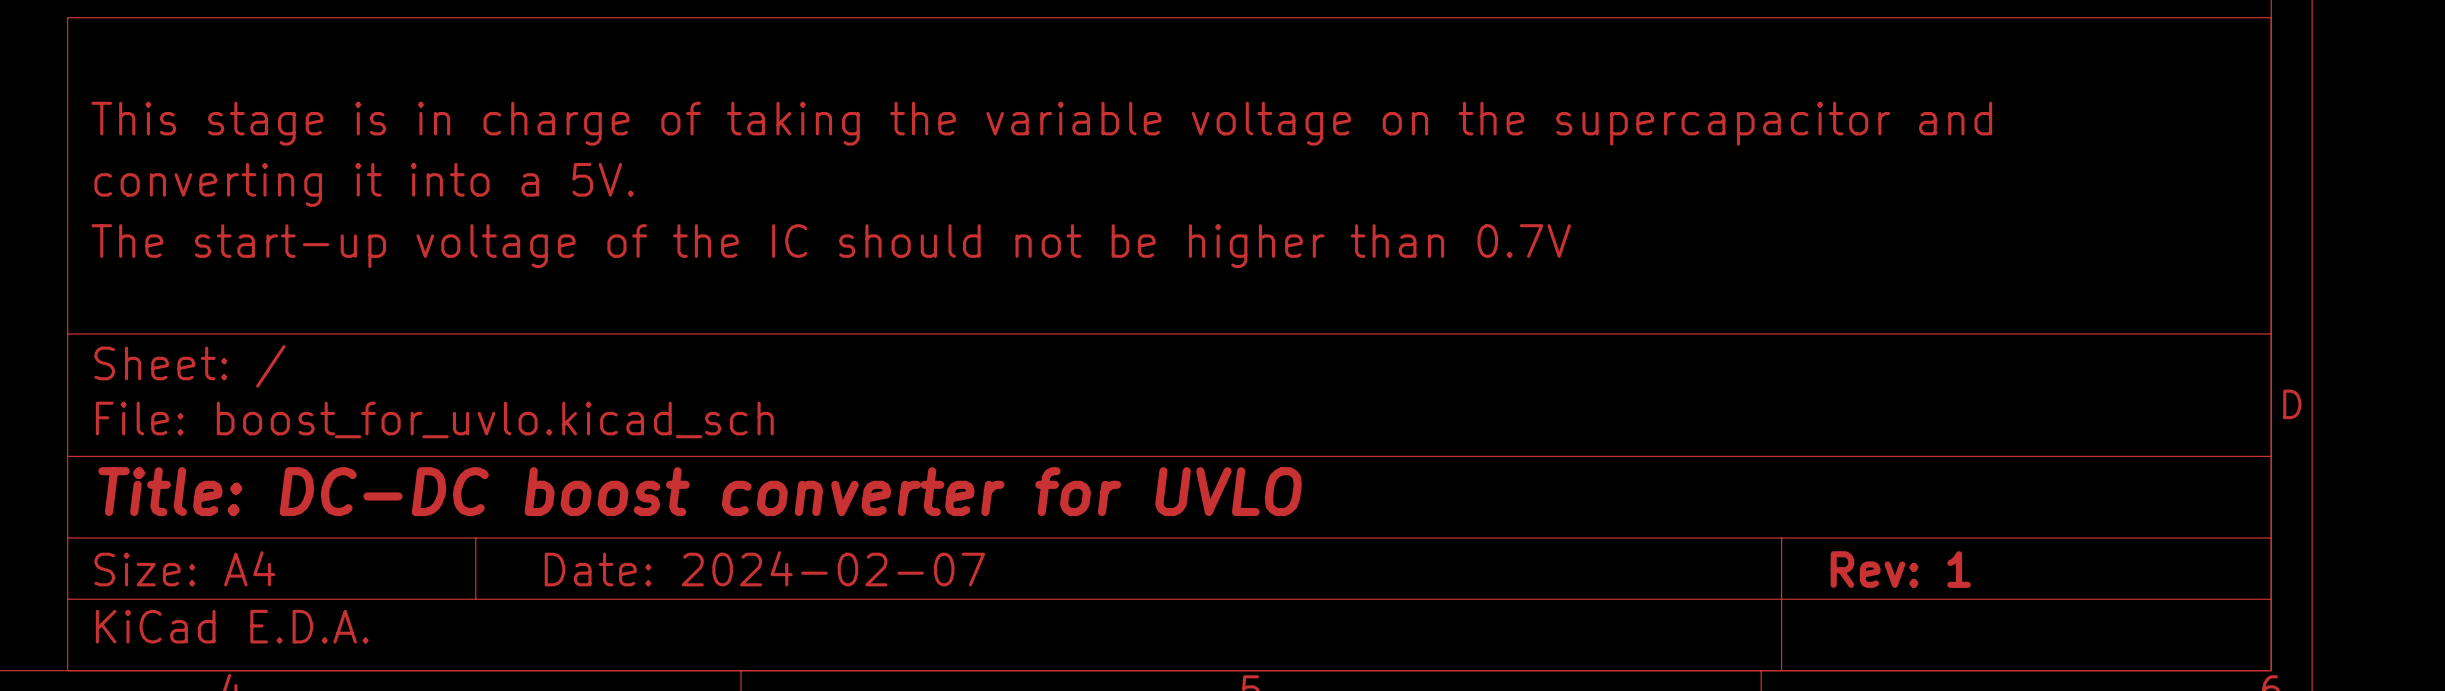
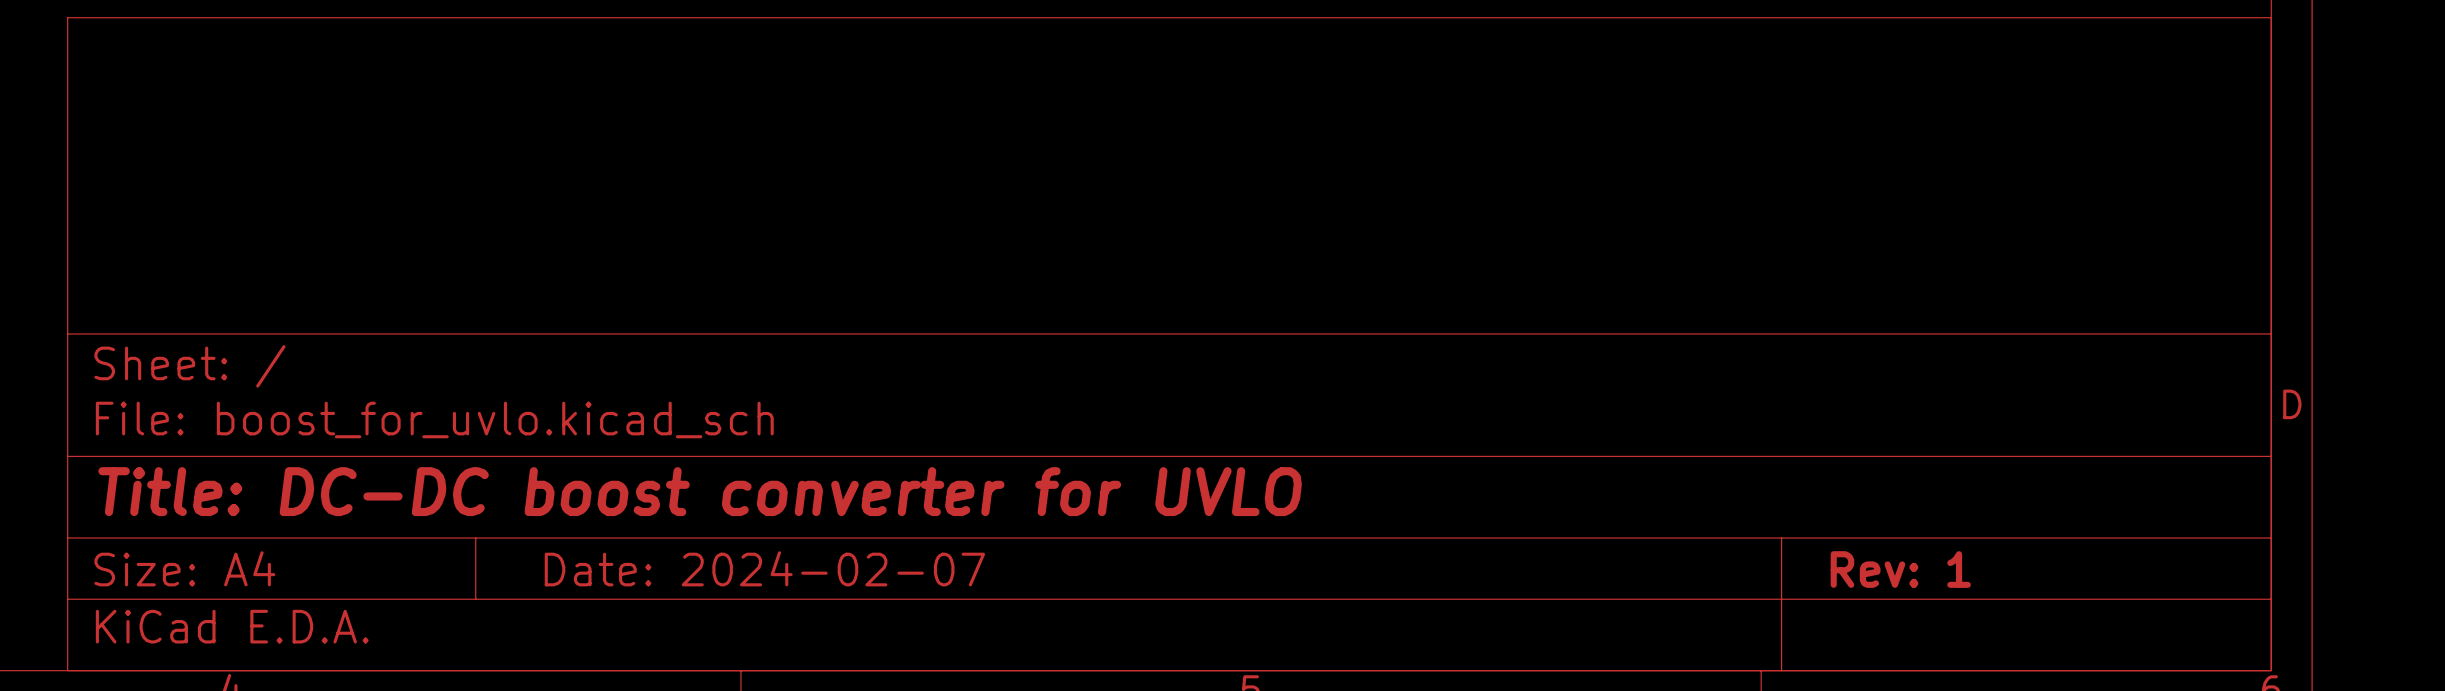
title block: This stage is in charge of taking the variable voltage on the supercapacitor and (1041, 123) -> none
title block: converting it into a 5V. (364, 184) -> none
title block: The start-up voltage of the IC should not be higher than 0.7V (831, 246) -> none

